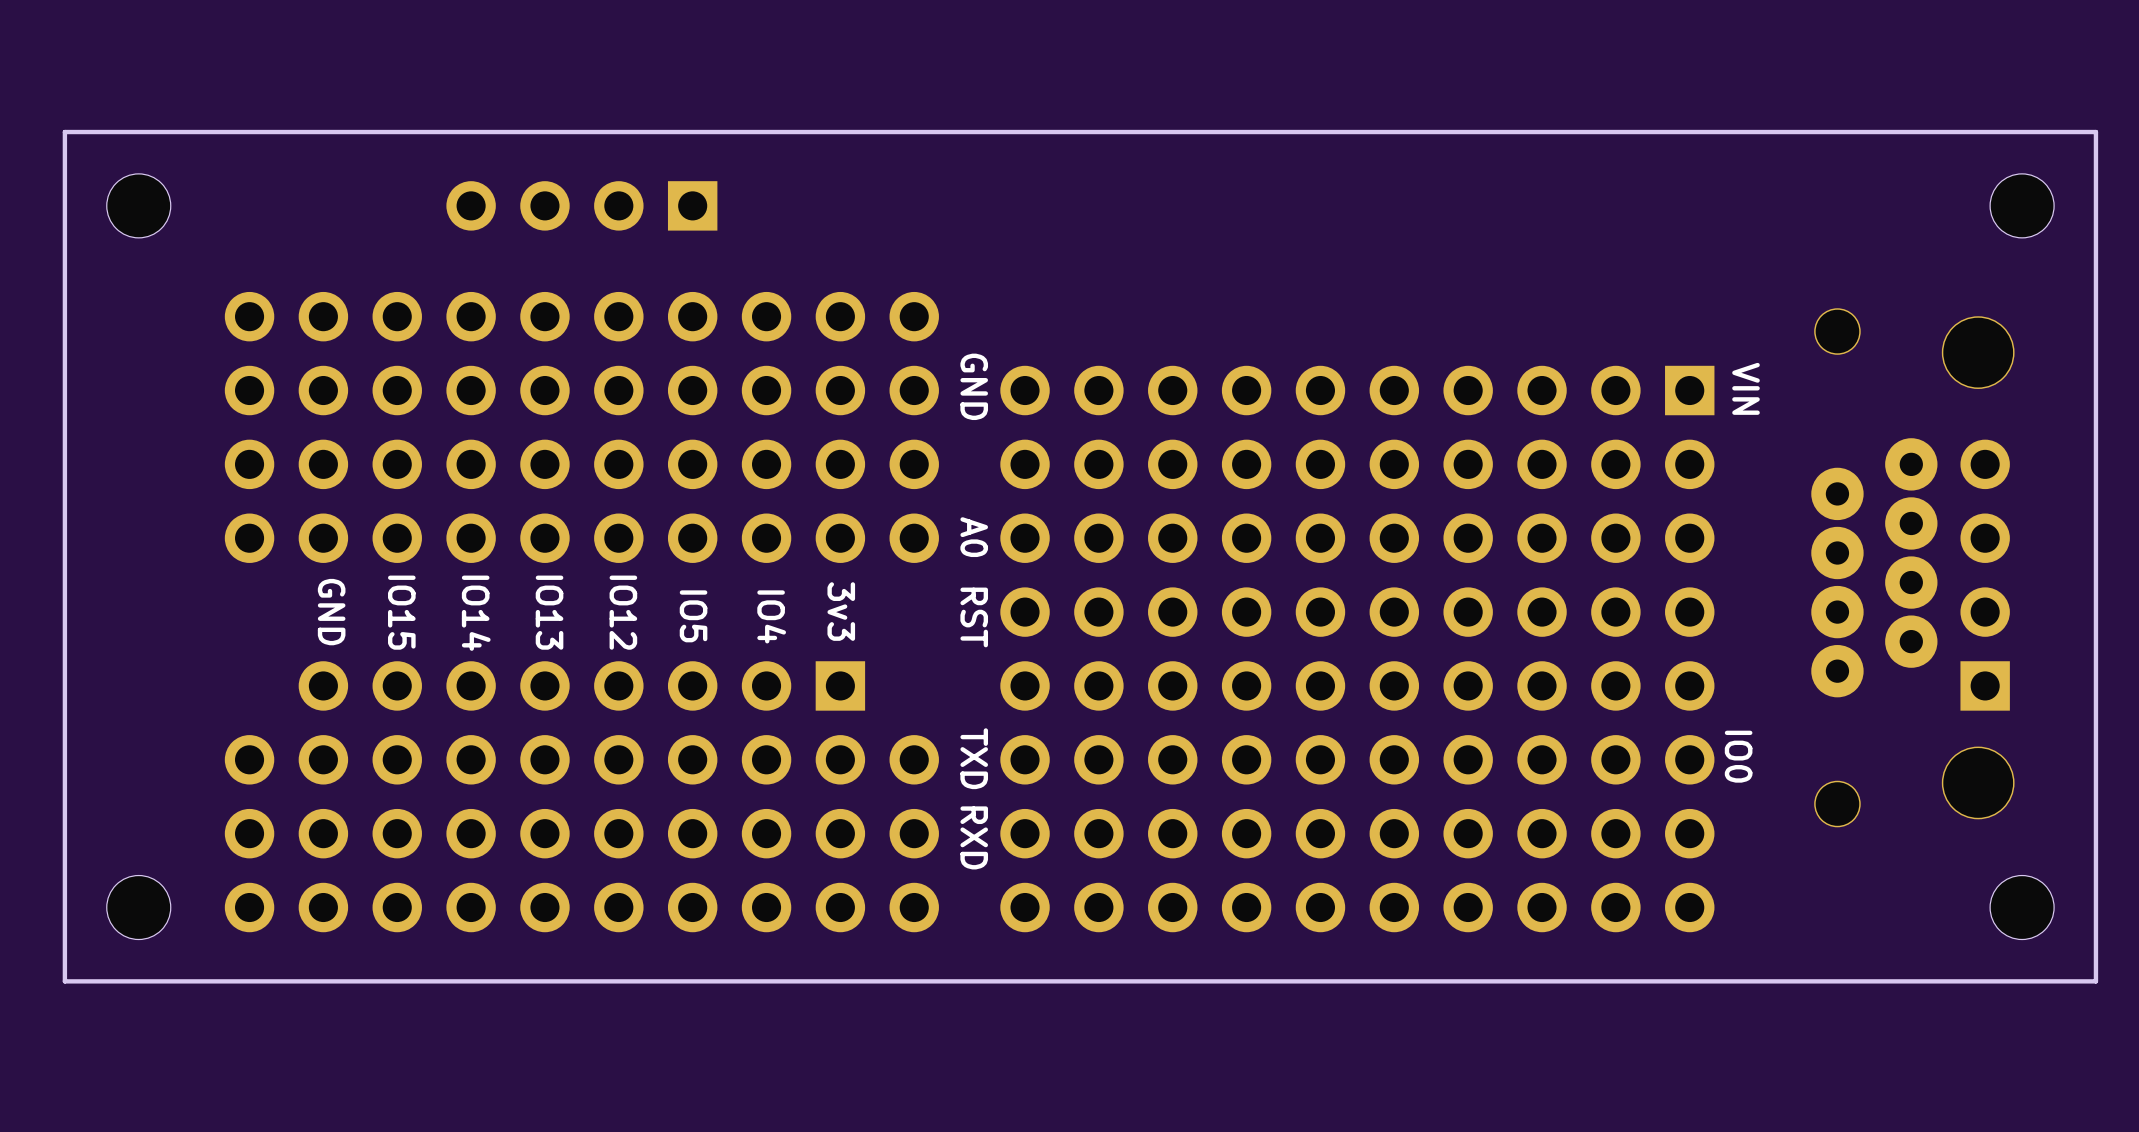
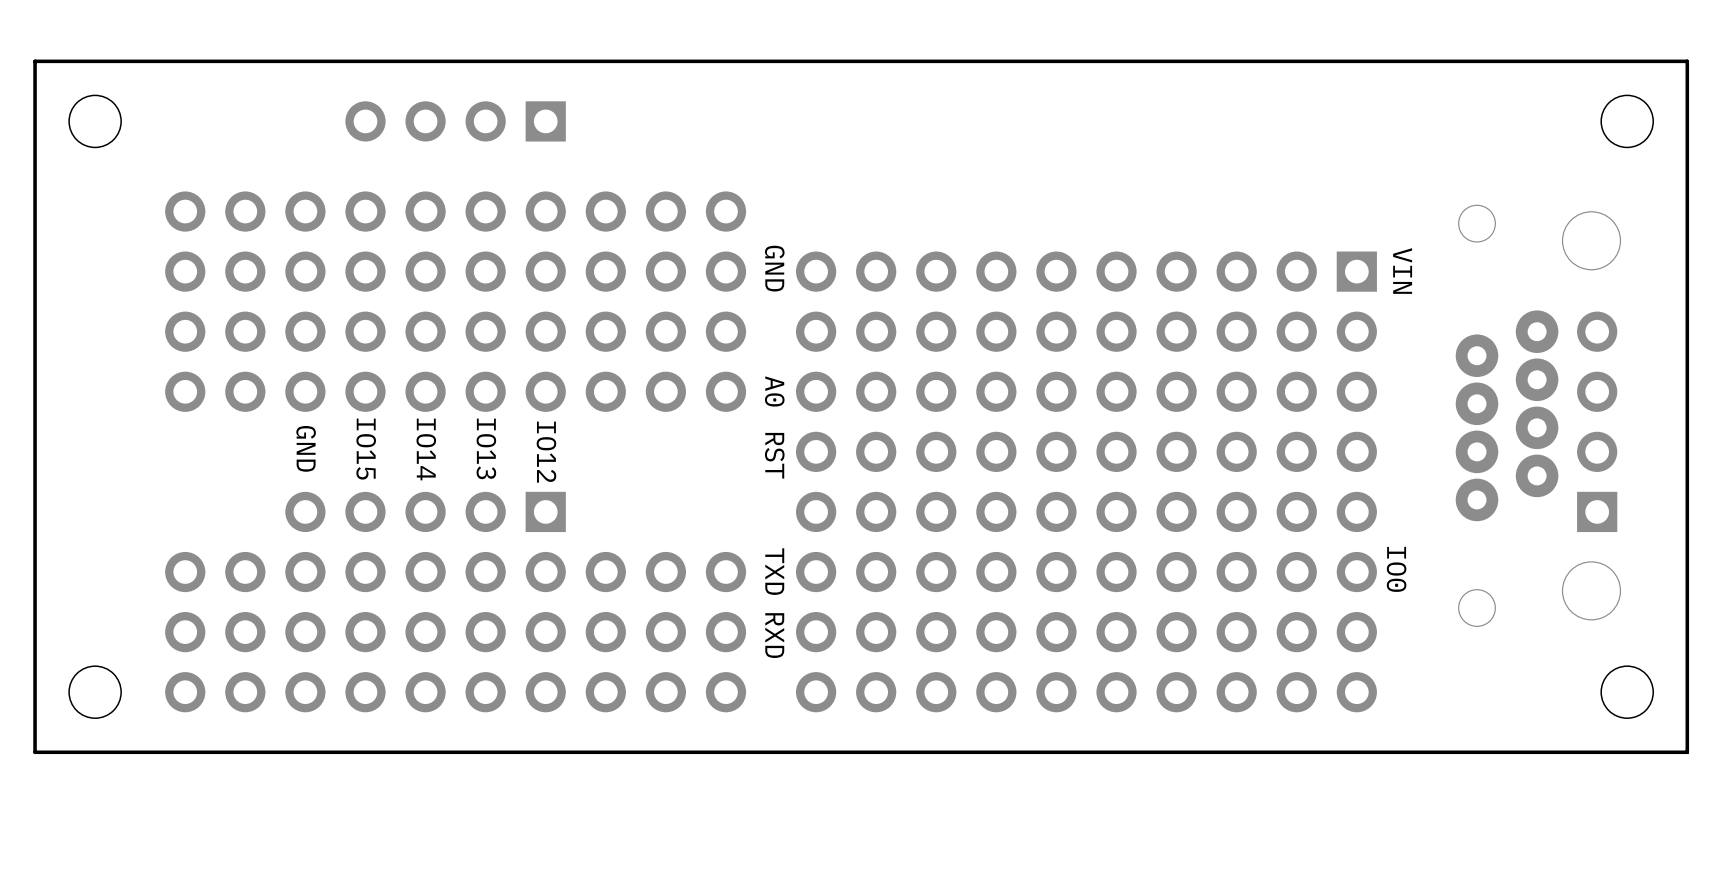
text: 3v3 (841, 611) -> none
text: GND (331, 612) -> none
text: IO15 (401, 612) -> GND (306, 448)
text: IO13 (549, 612) -> IO14 (426, 449)
text: IO12 (623, 612) -> IO13 (486, 448)
text: IO14 (476, 613) -> IO15 (366, 449)
text: IO5 (693, 616) -> IO12 (546, 452)
text: IO4 (771, 616) -> none
part: none -> (425, 511)
part: (581, 685) -> none

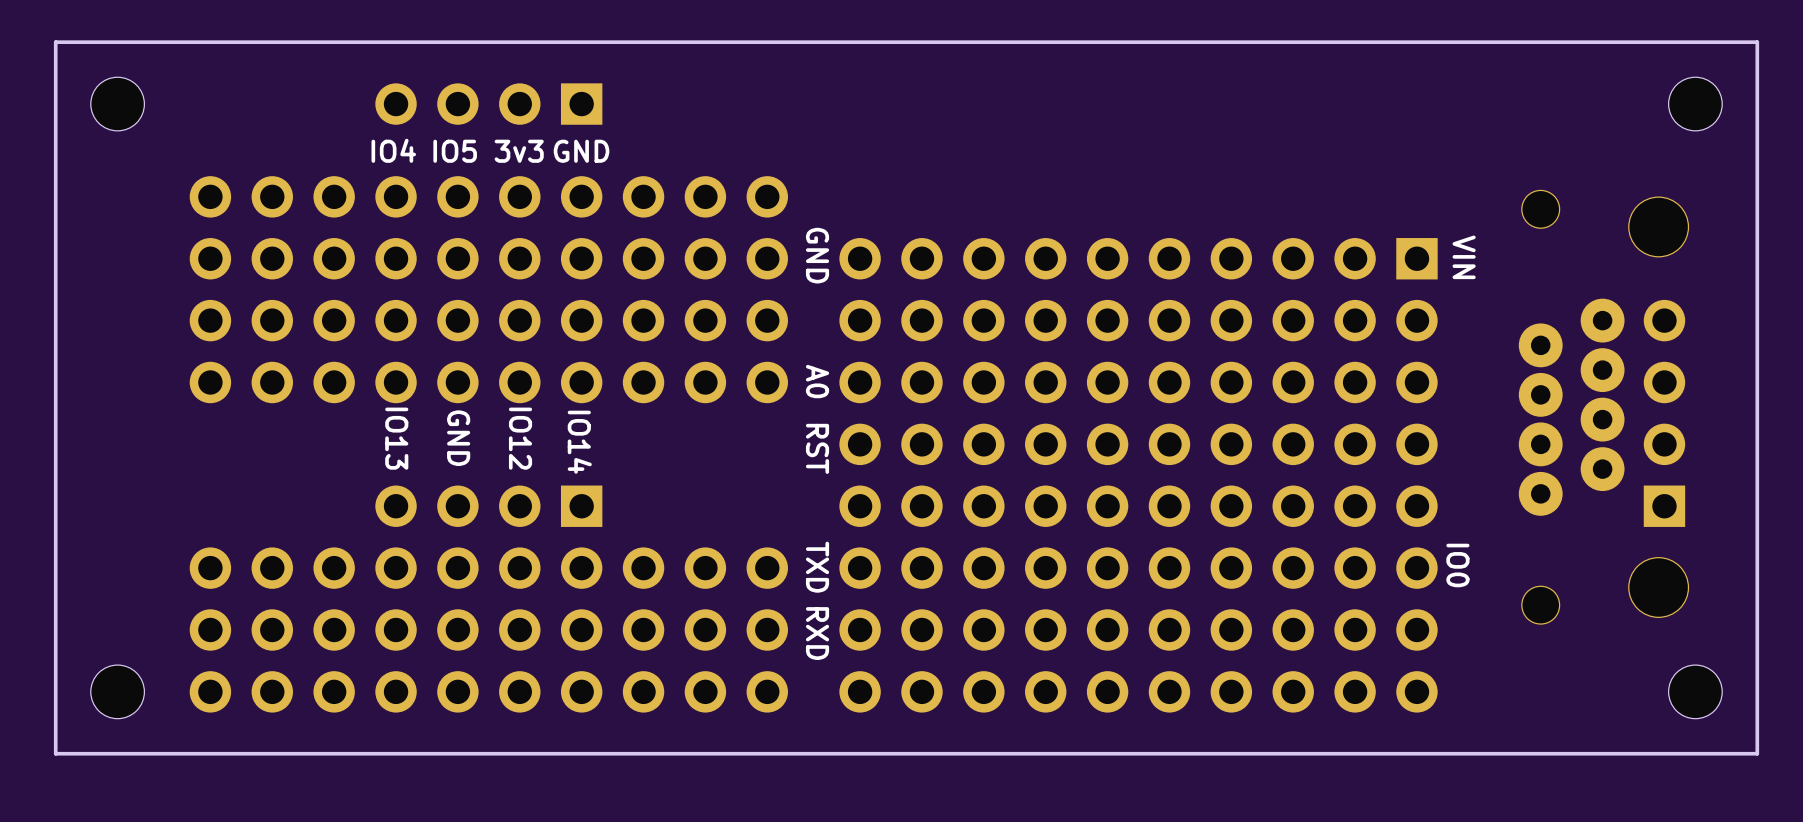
text: none -> IO4 (393, 150)
text: none -> IO5 (455, 151)
text: none -> 3v3 (519, 151)
text rotation: 0° (306, 448) -> 90° counterclockwise (581, 151)
text position: GND (306, 448) -> GND (581, 151)
text: IO13 (486, 448) -> IO12 (520, 438)
text: IO15 (366, 449) -> IO13 (396, 438)
text: IO14 (426, 449) -> GND (458, 438)
text: IO12 (546, 452) -> IO14 (579, 442)
part: (425, 511) -> none

